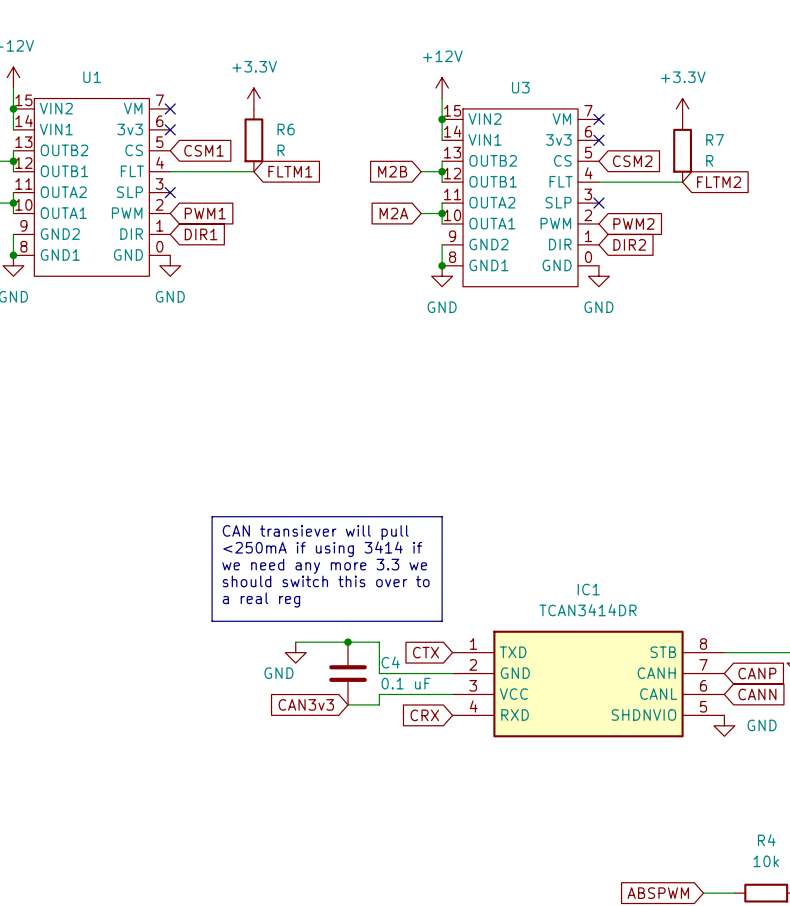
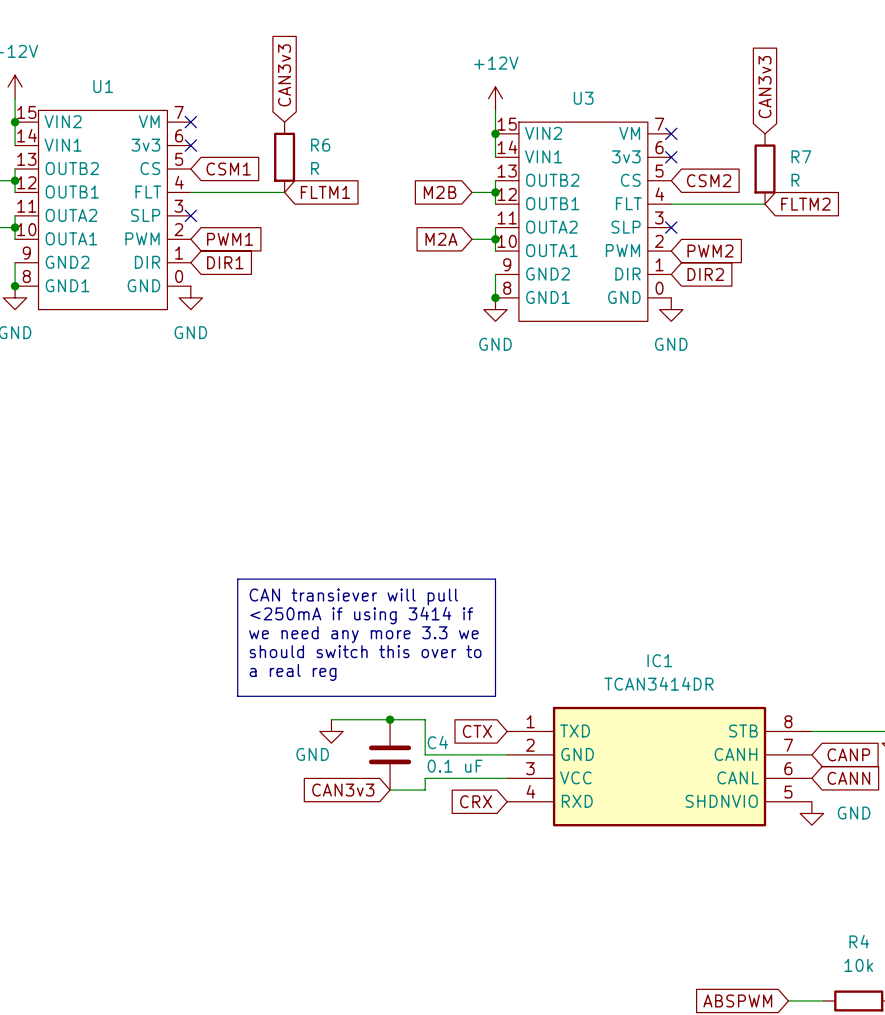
global label: none -> CAN3v3 (284, 75)
global label: none -> CAN3v3 (765, 87)
power symbol: +3.3V (253, 98) -> none
power symbol: +3.3V (682, 108) -> none

